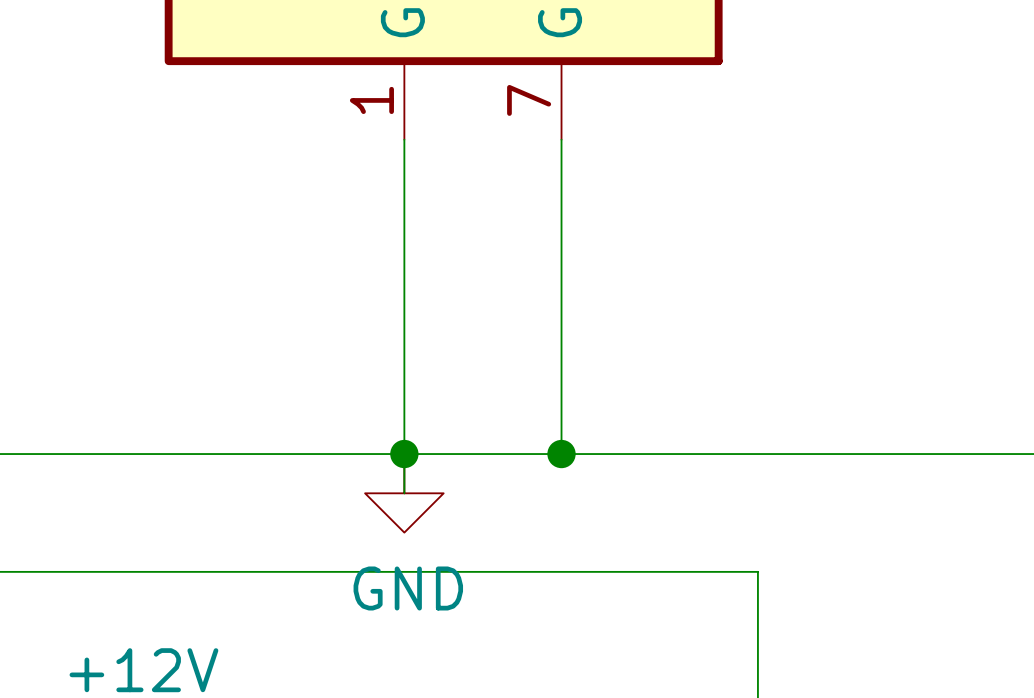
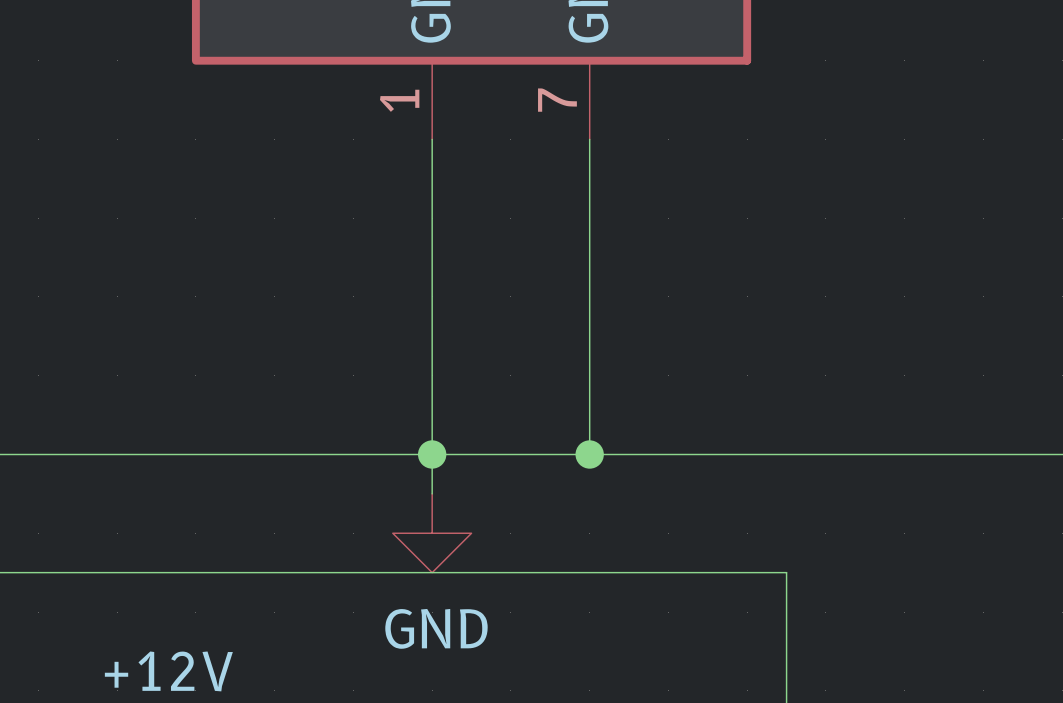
power symbol position: GND (404, 493) -> GND (432, 533)

